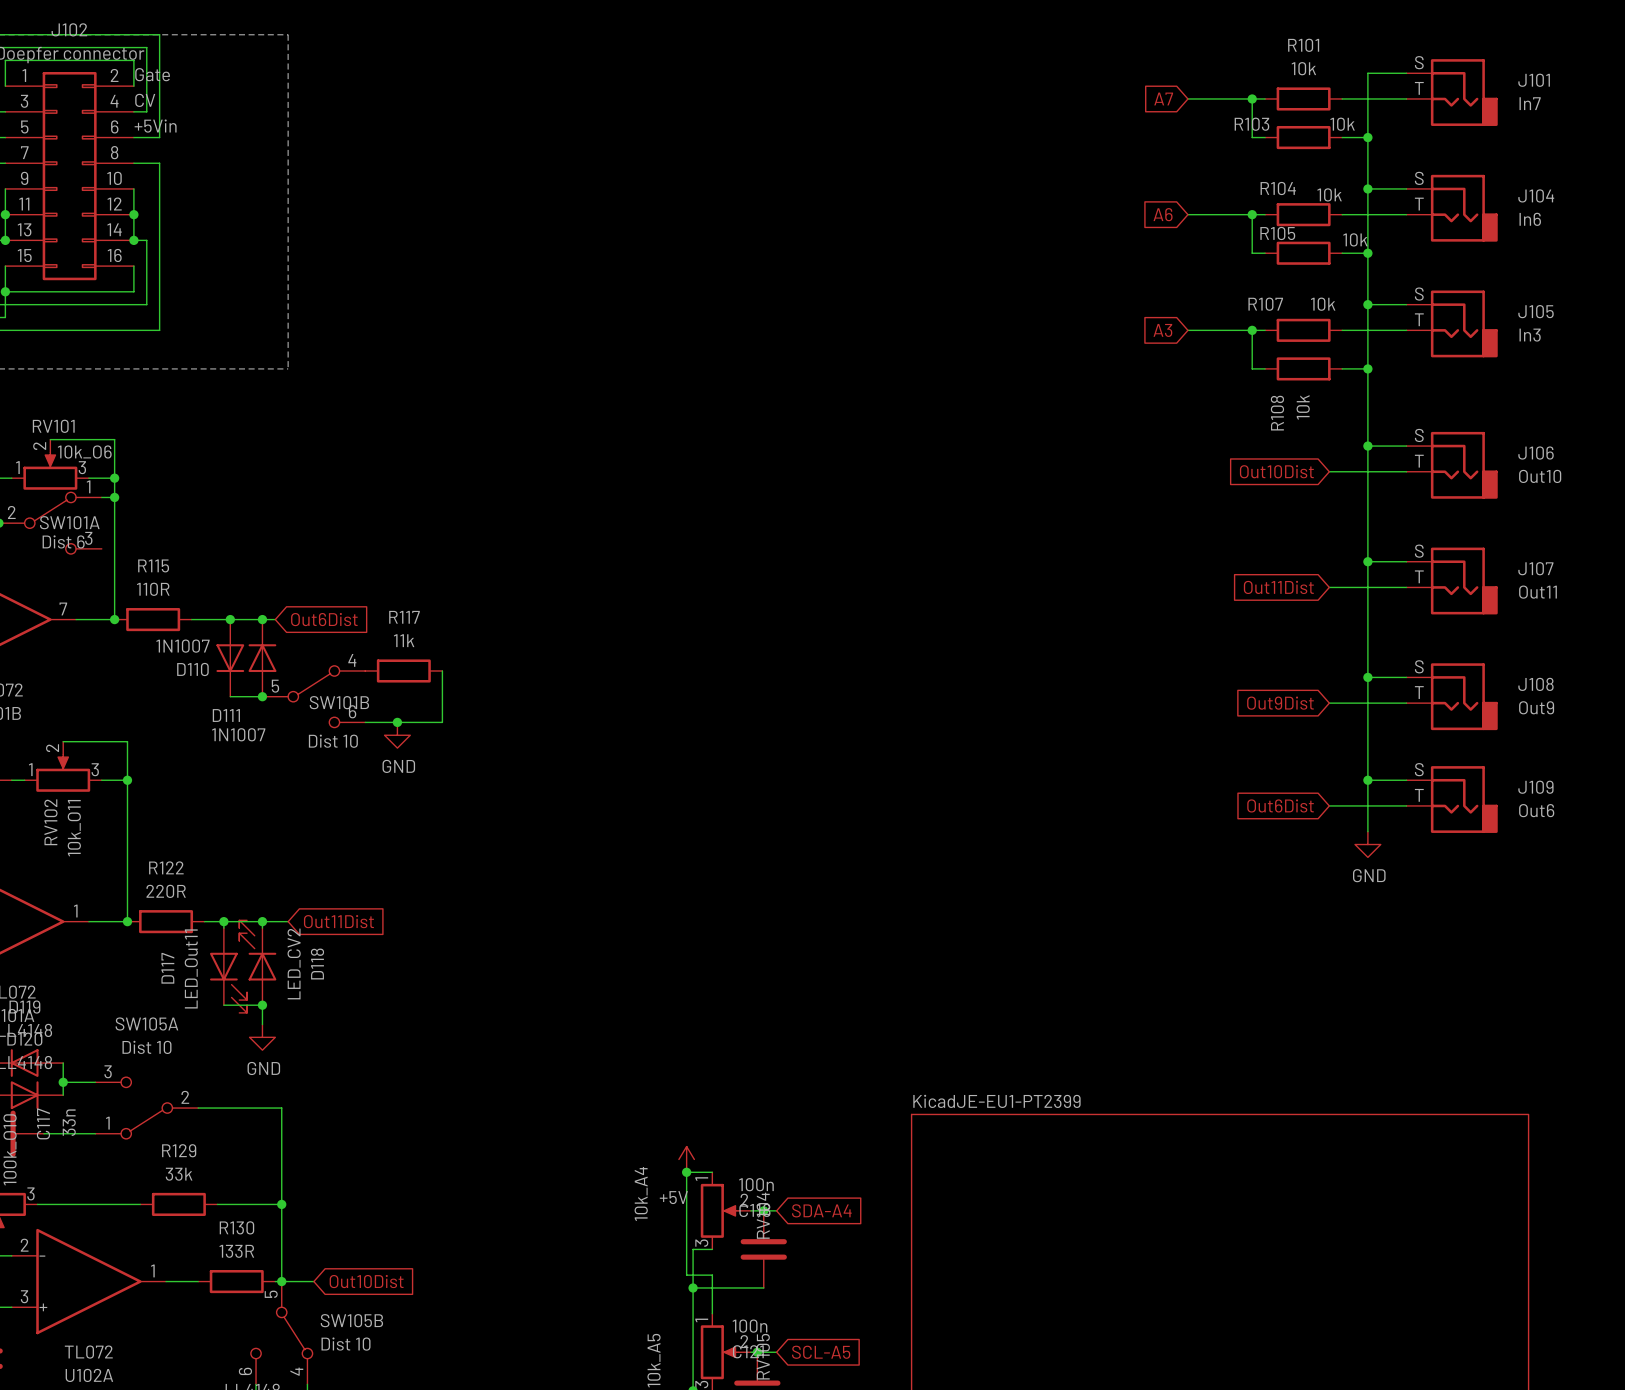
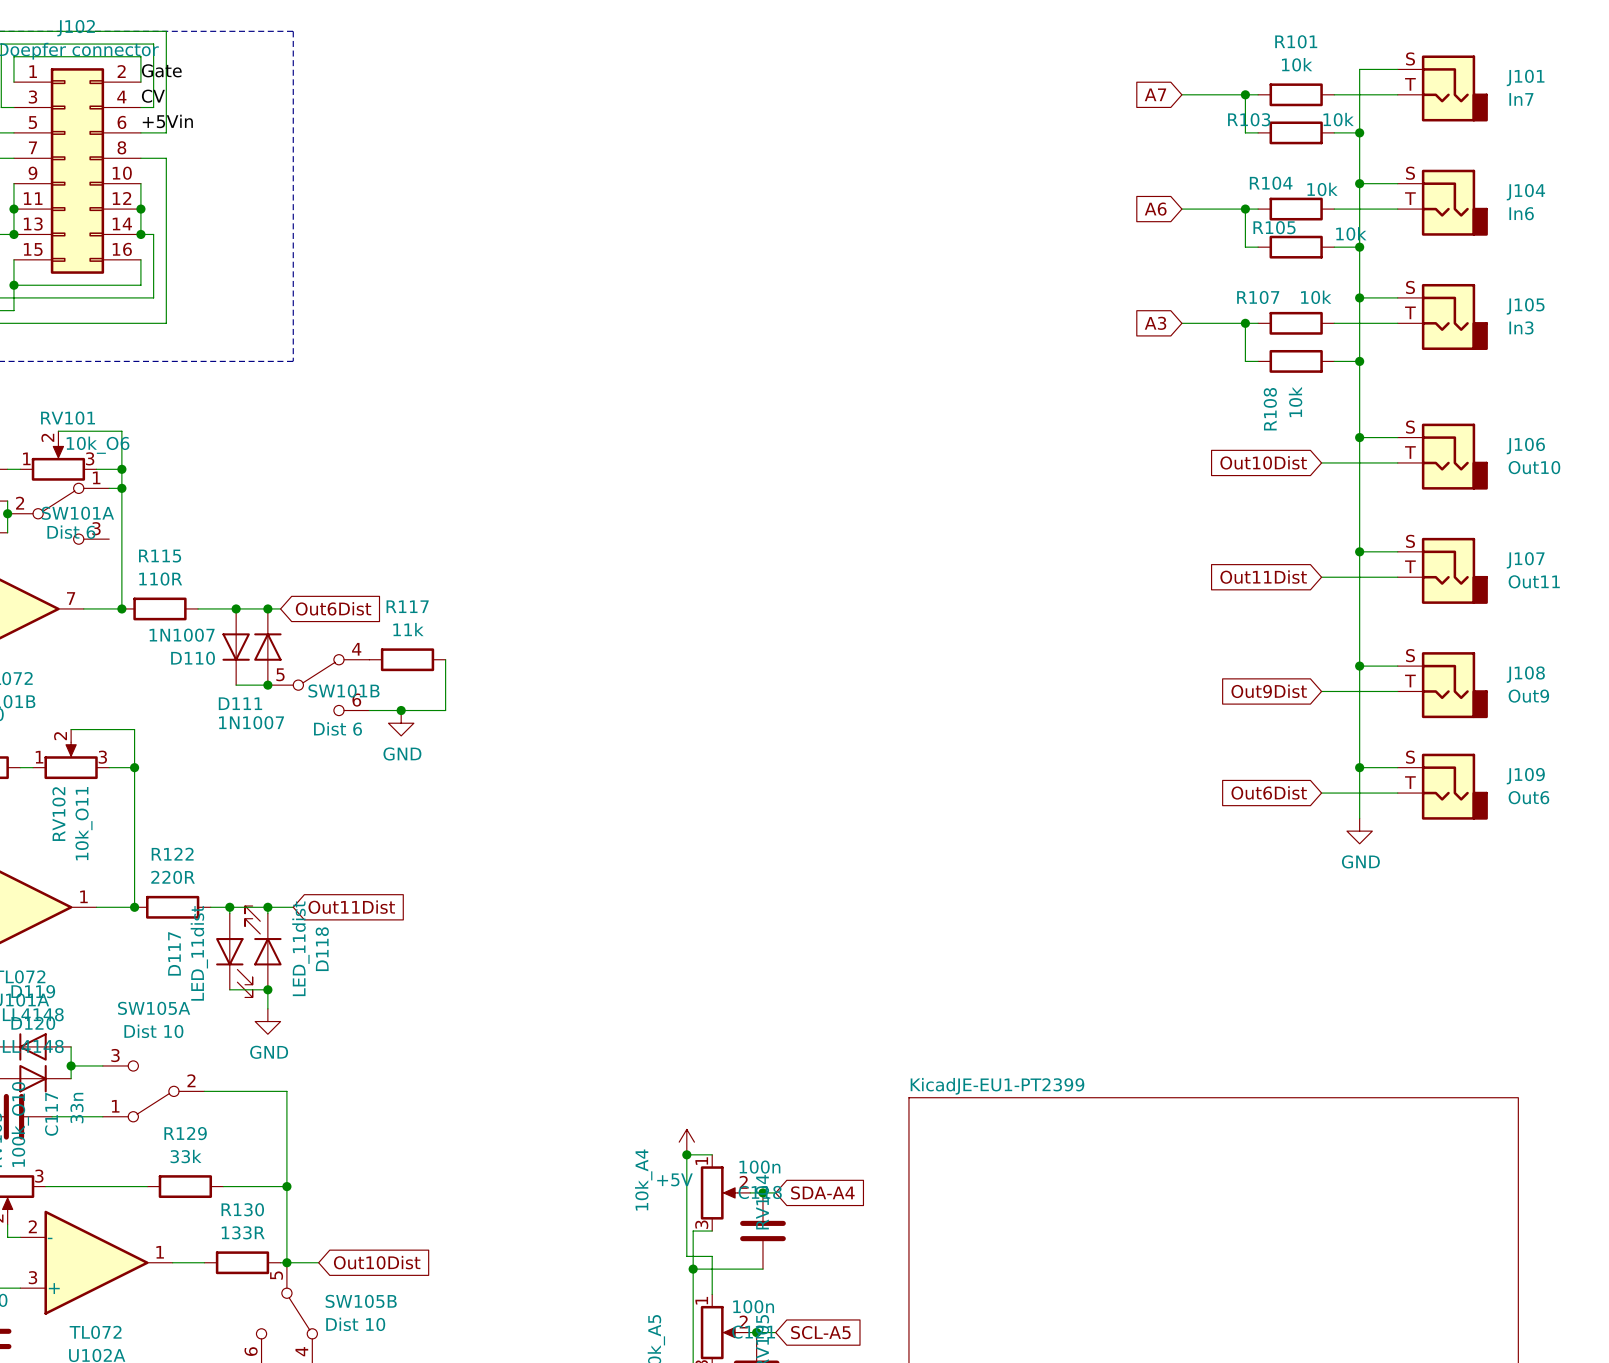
SW101B value: Dist 10 (333, 741) -> Dist 6 (338, 728)
D118 value: LED_CV2 (294, 963) -> LED_11dist (300, 948)
D117 value: LED_Out11 (191, 968) -> LED_11dist (199, 953)

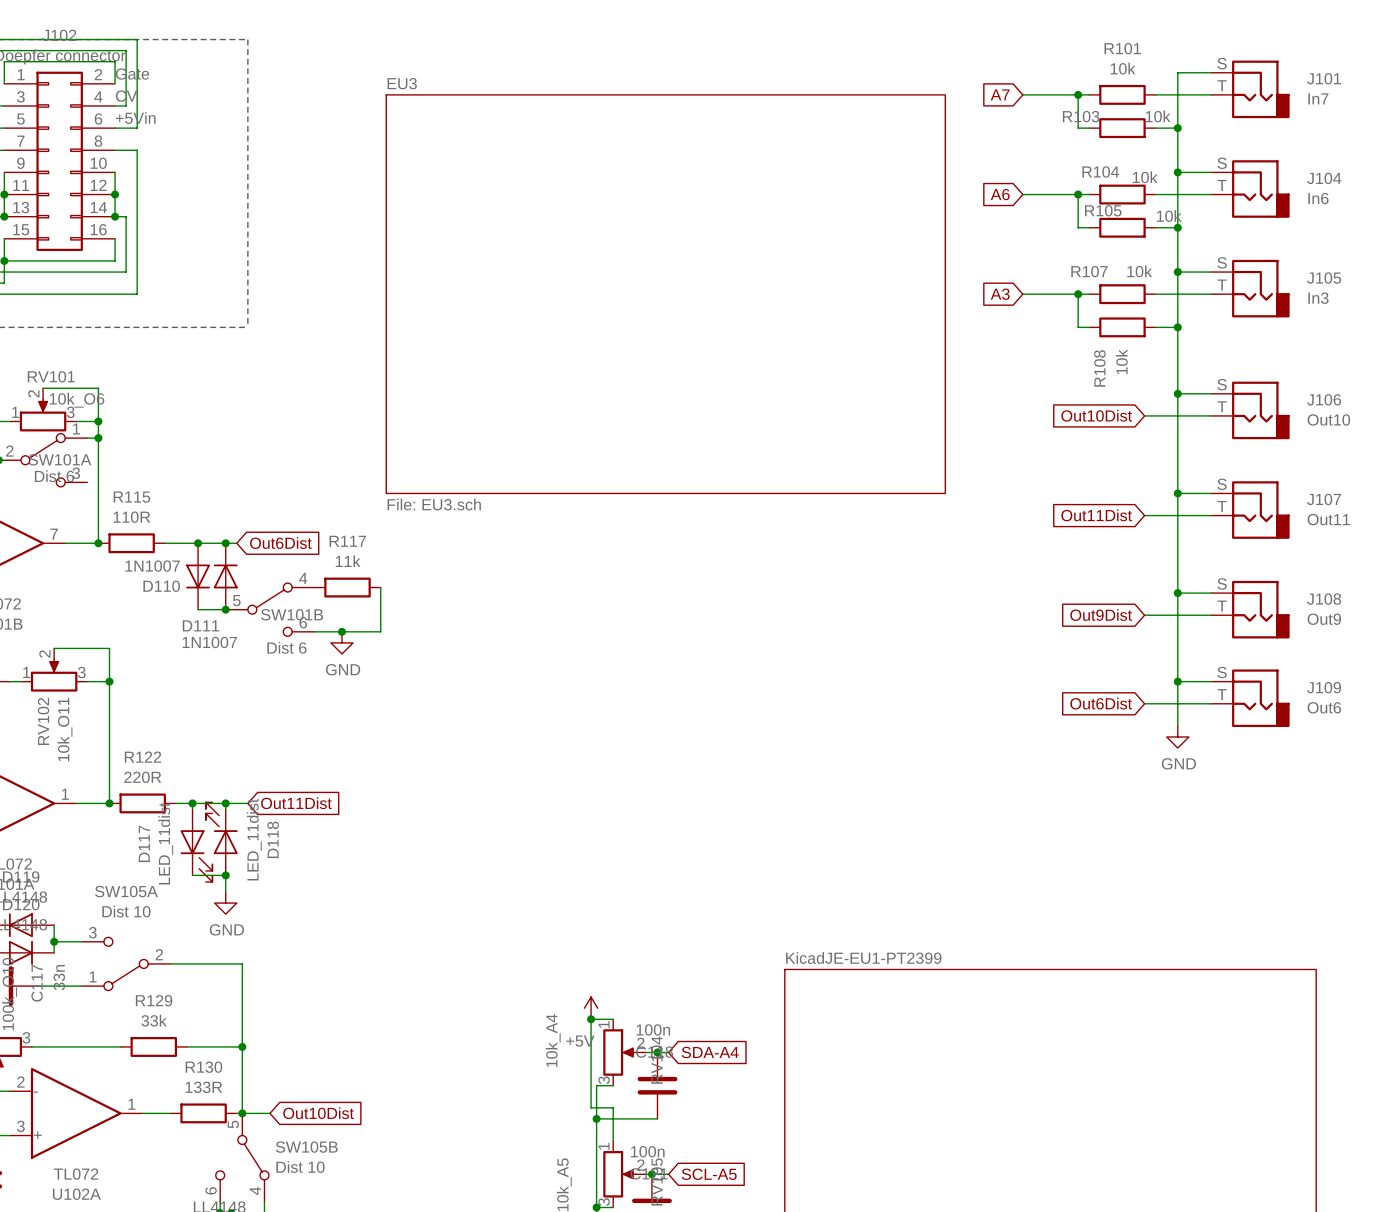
sheet EU3: none -> File: EU3.sch (665, 294)

